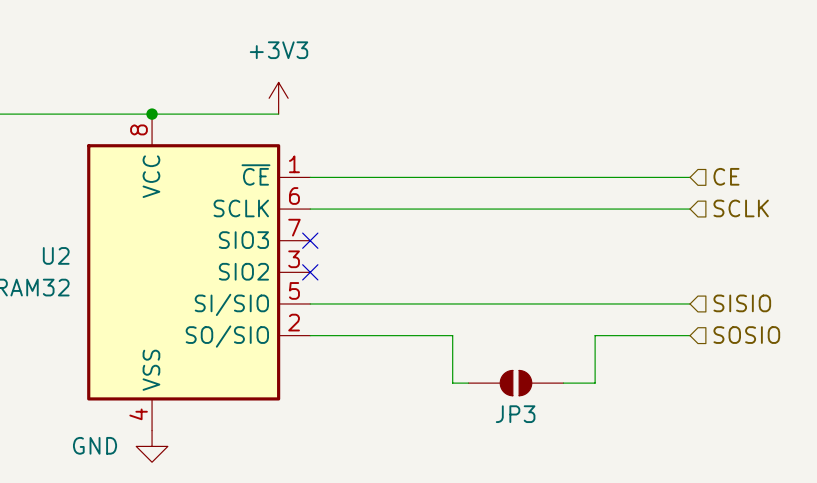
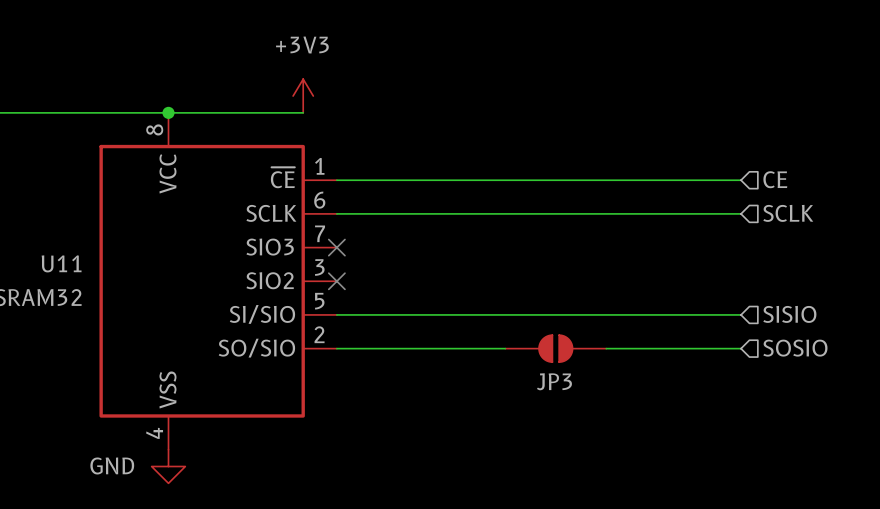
U2 name: U2 (56, 255) -> U11 (61, 263)
wire: (452, 335) (452, 383) (468, 383) -> (488, 348) (505, 348)
wire: (595, 335) (595, 383) (563, 383) -> (639, 348) (606, 348)
JP3 position: (515, 383) -> (555, 348)

